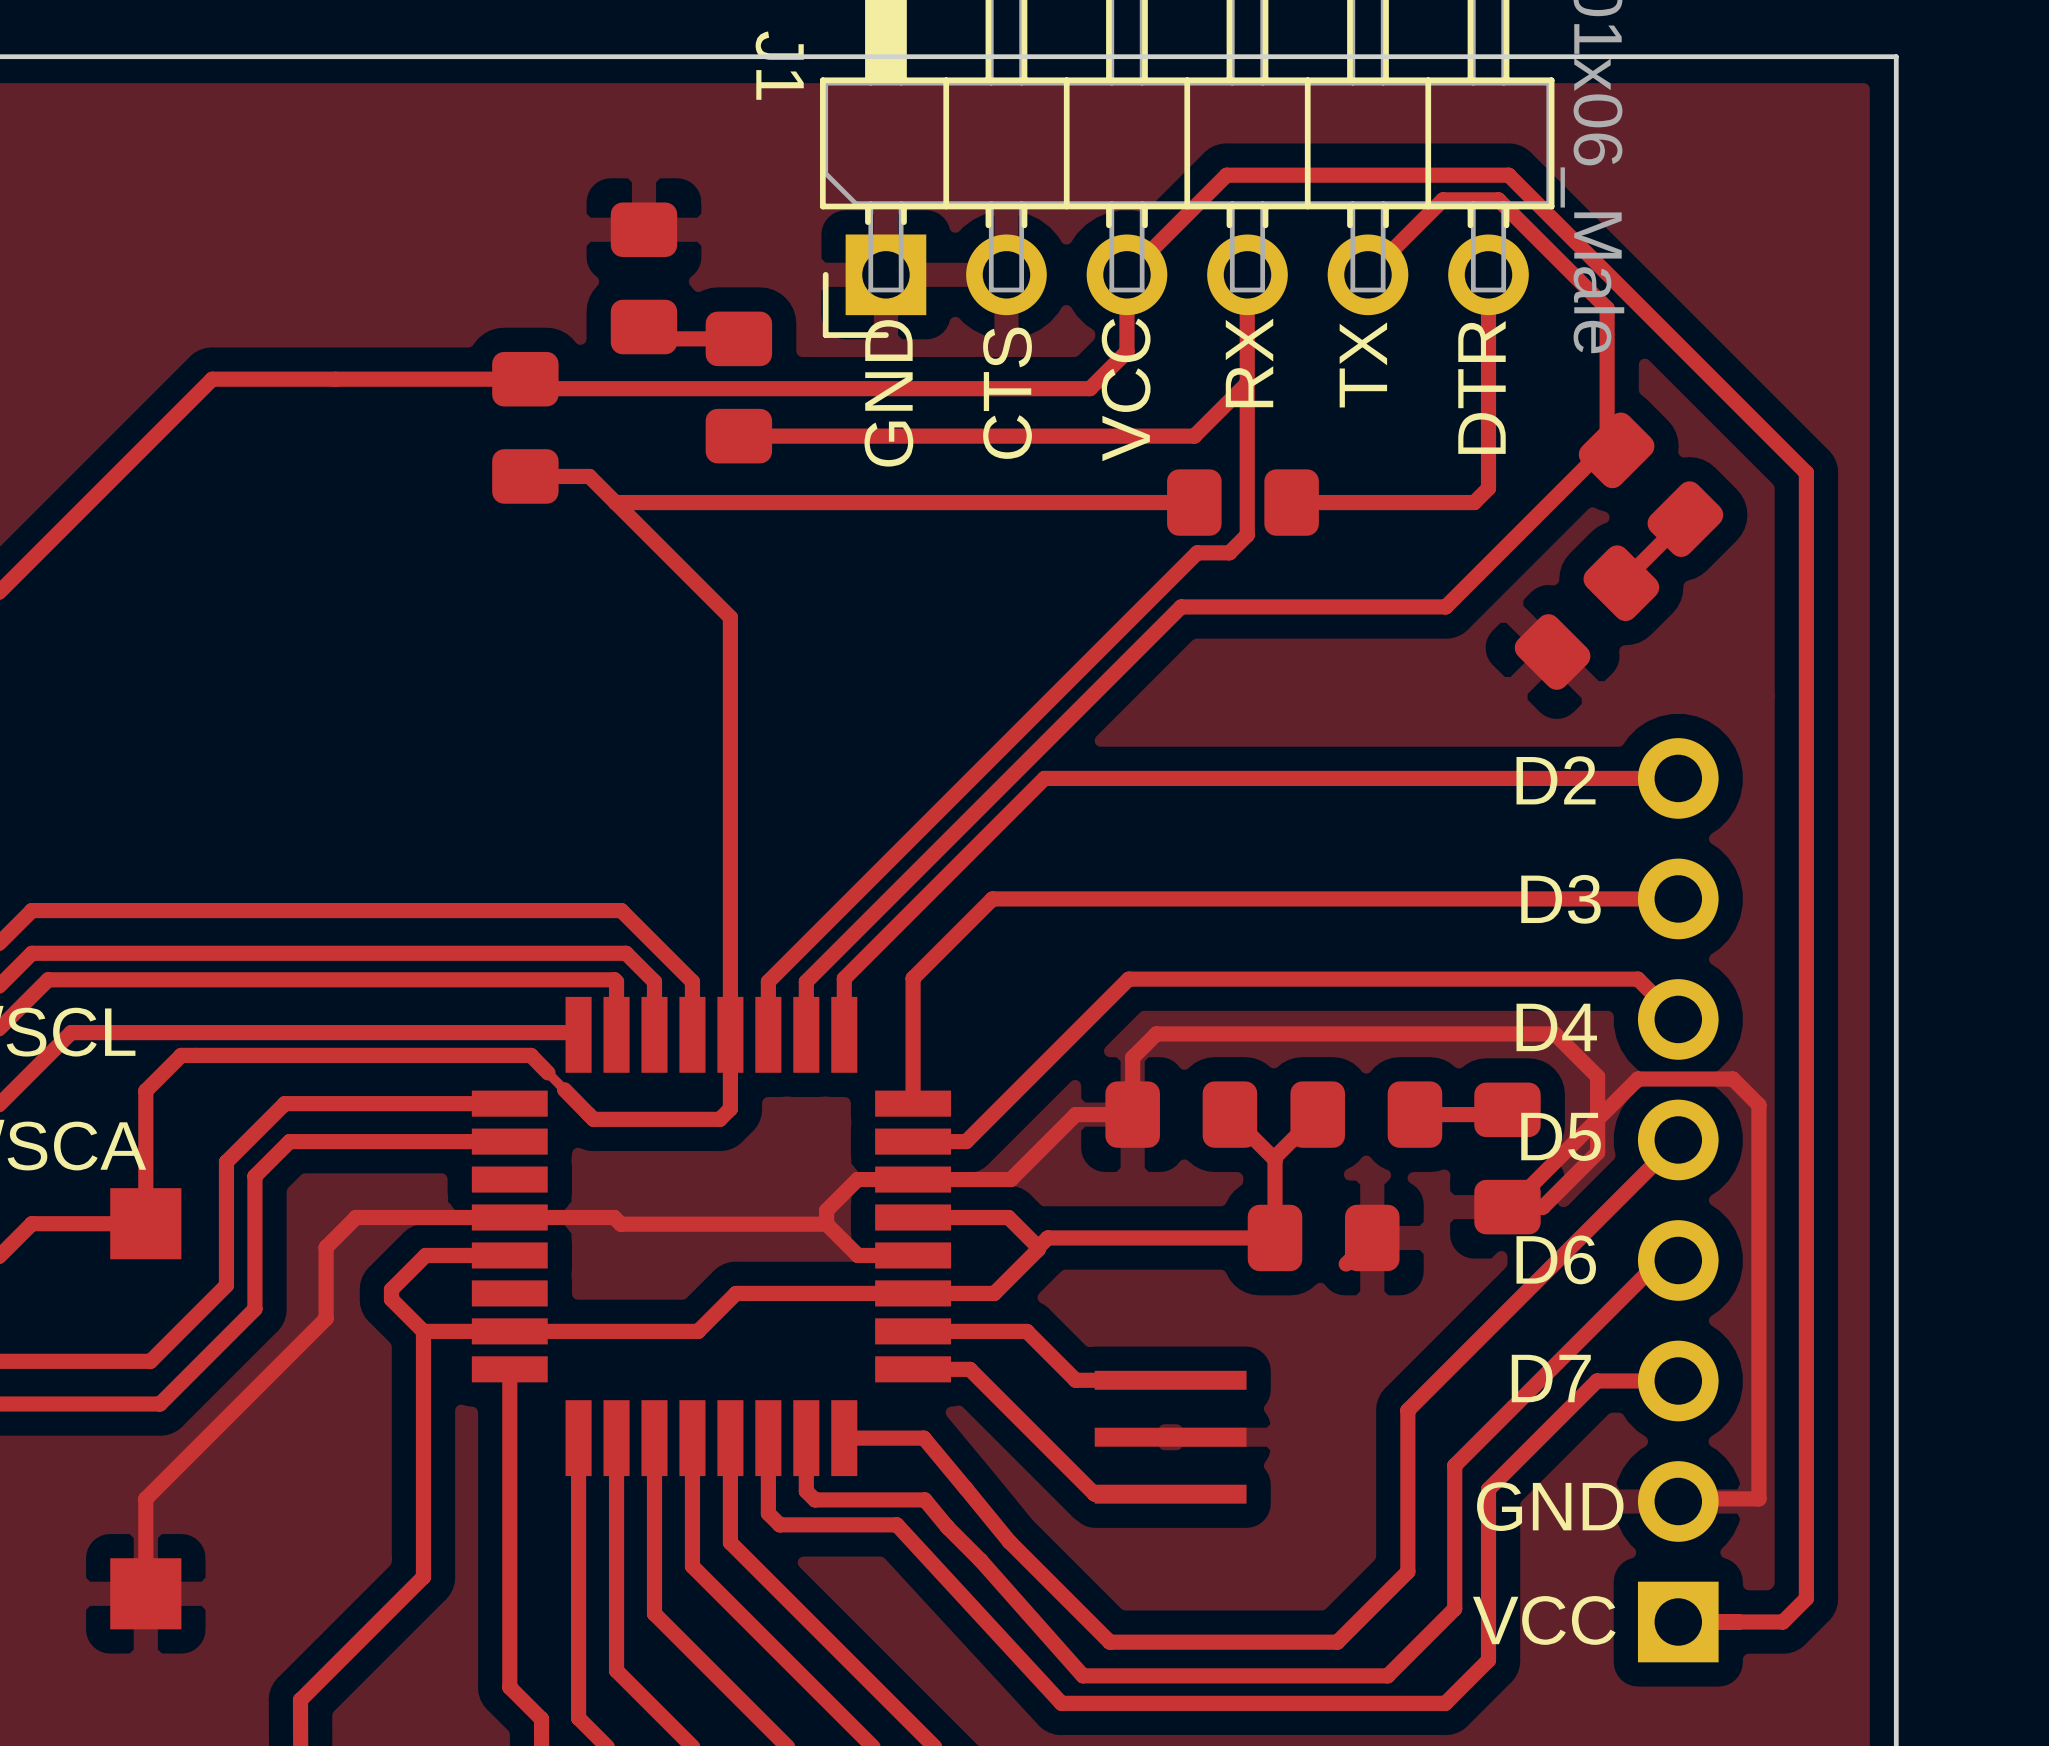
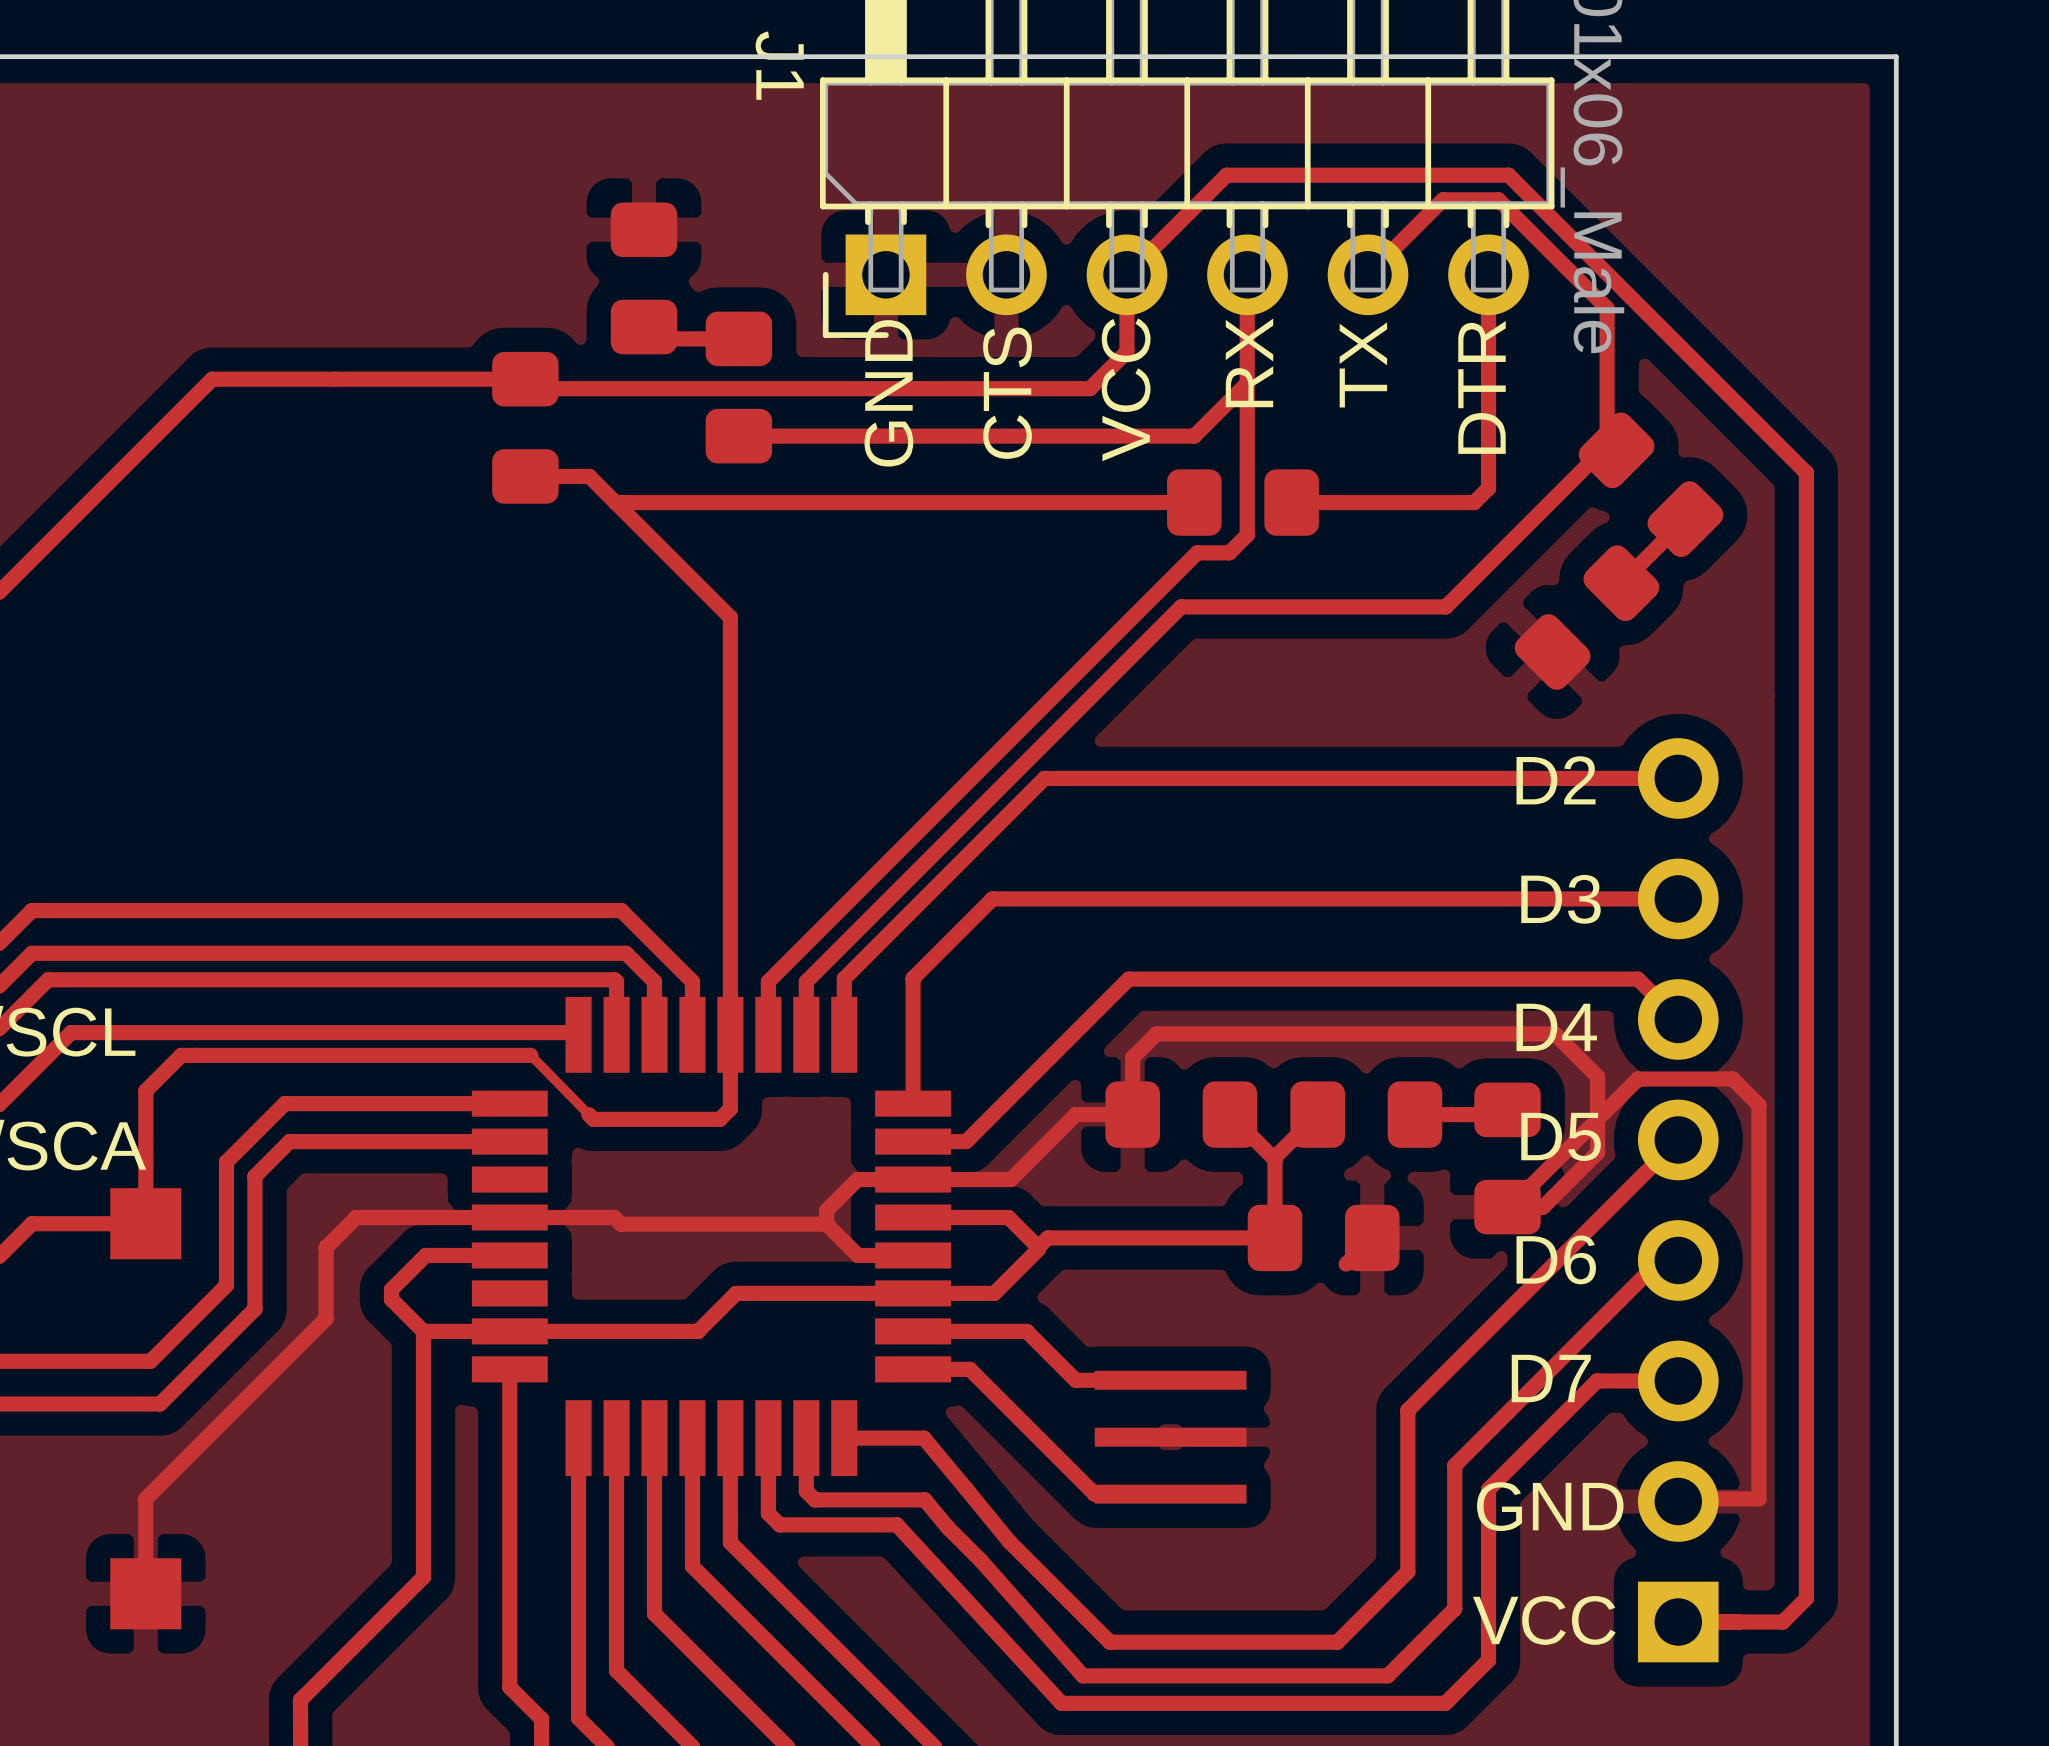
top track width: thick (530, 1055) (548, 1072) -> thin (530, 1055) (548, 1072)
top track width: thick (564, 1089) (588, 1114) -> thin (564, 1089) (588, 1114)

